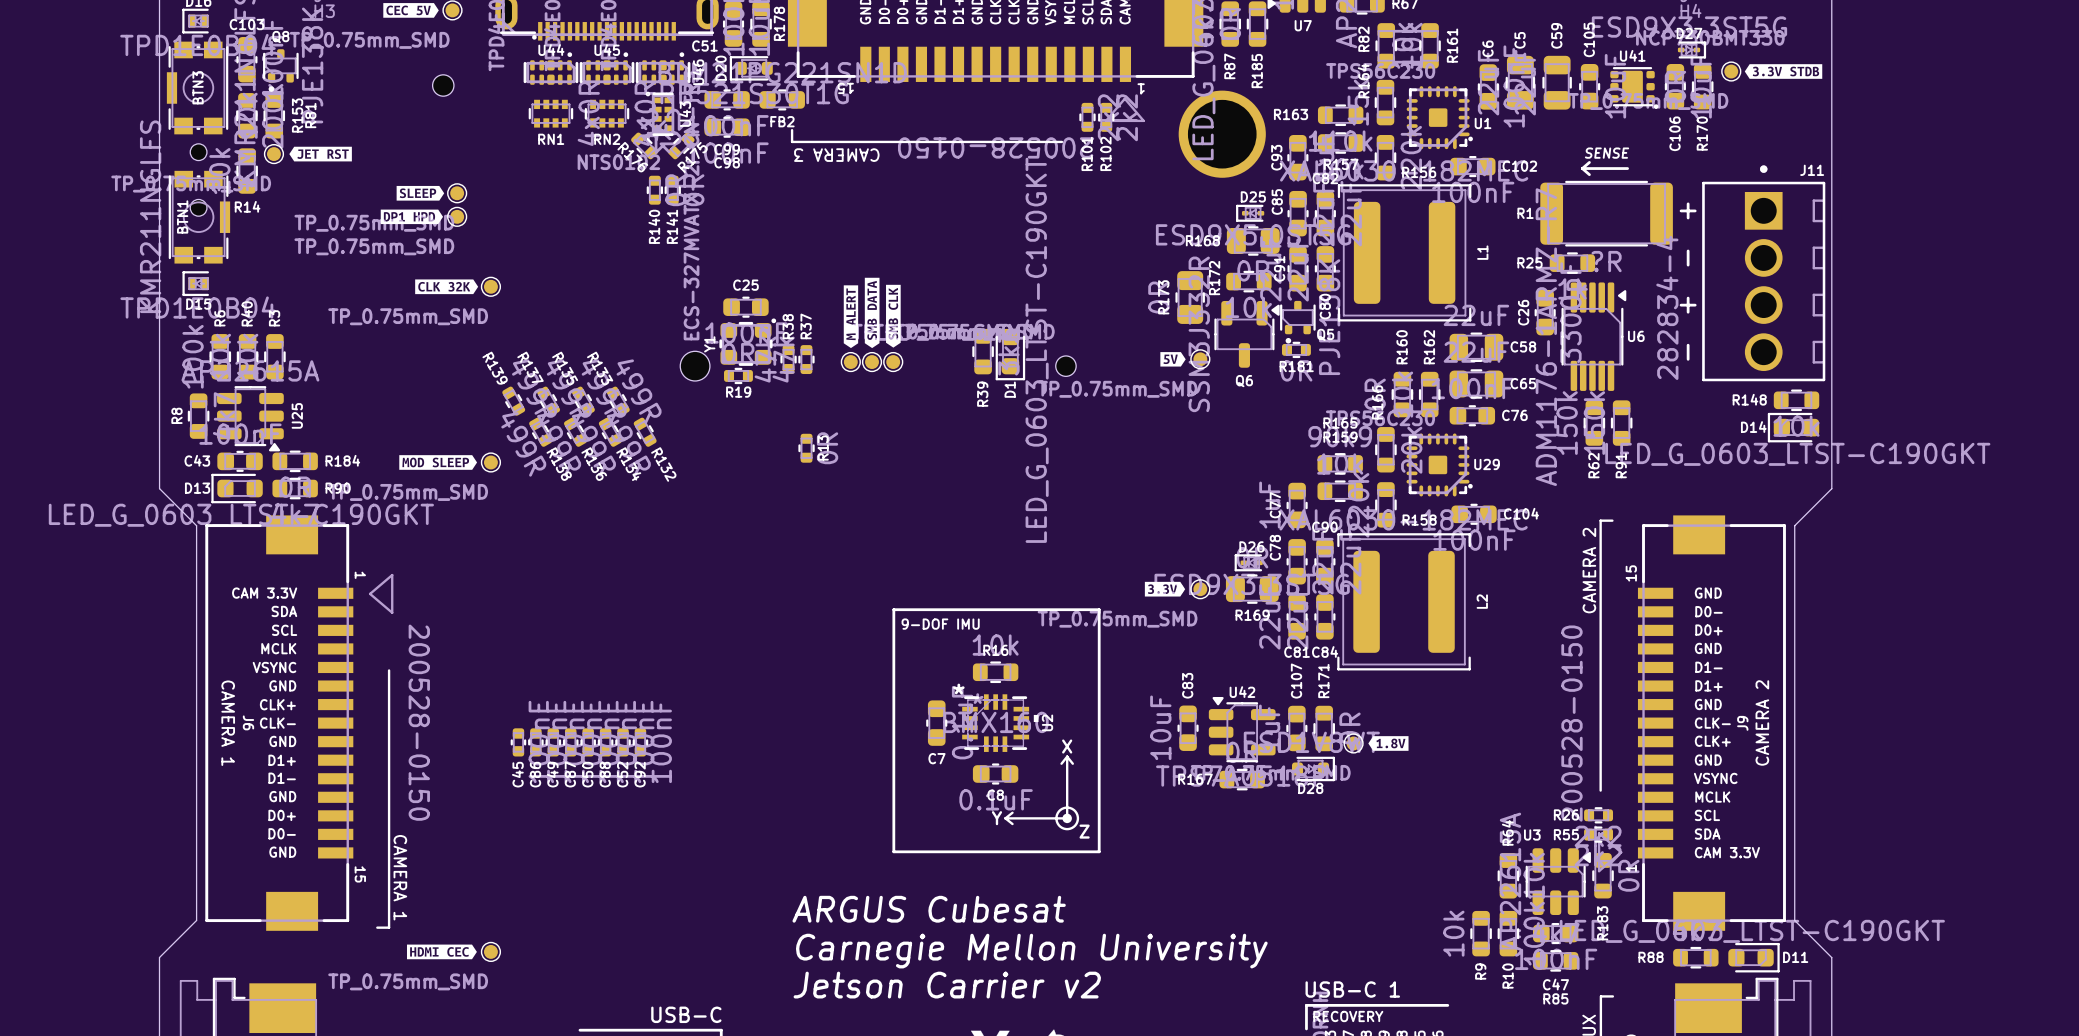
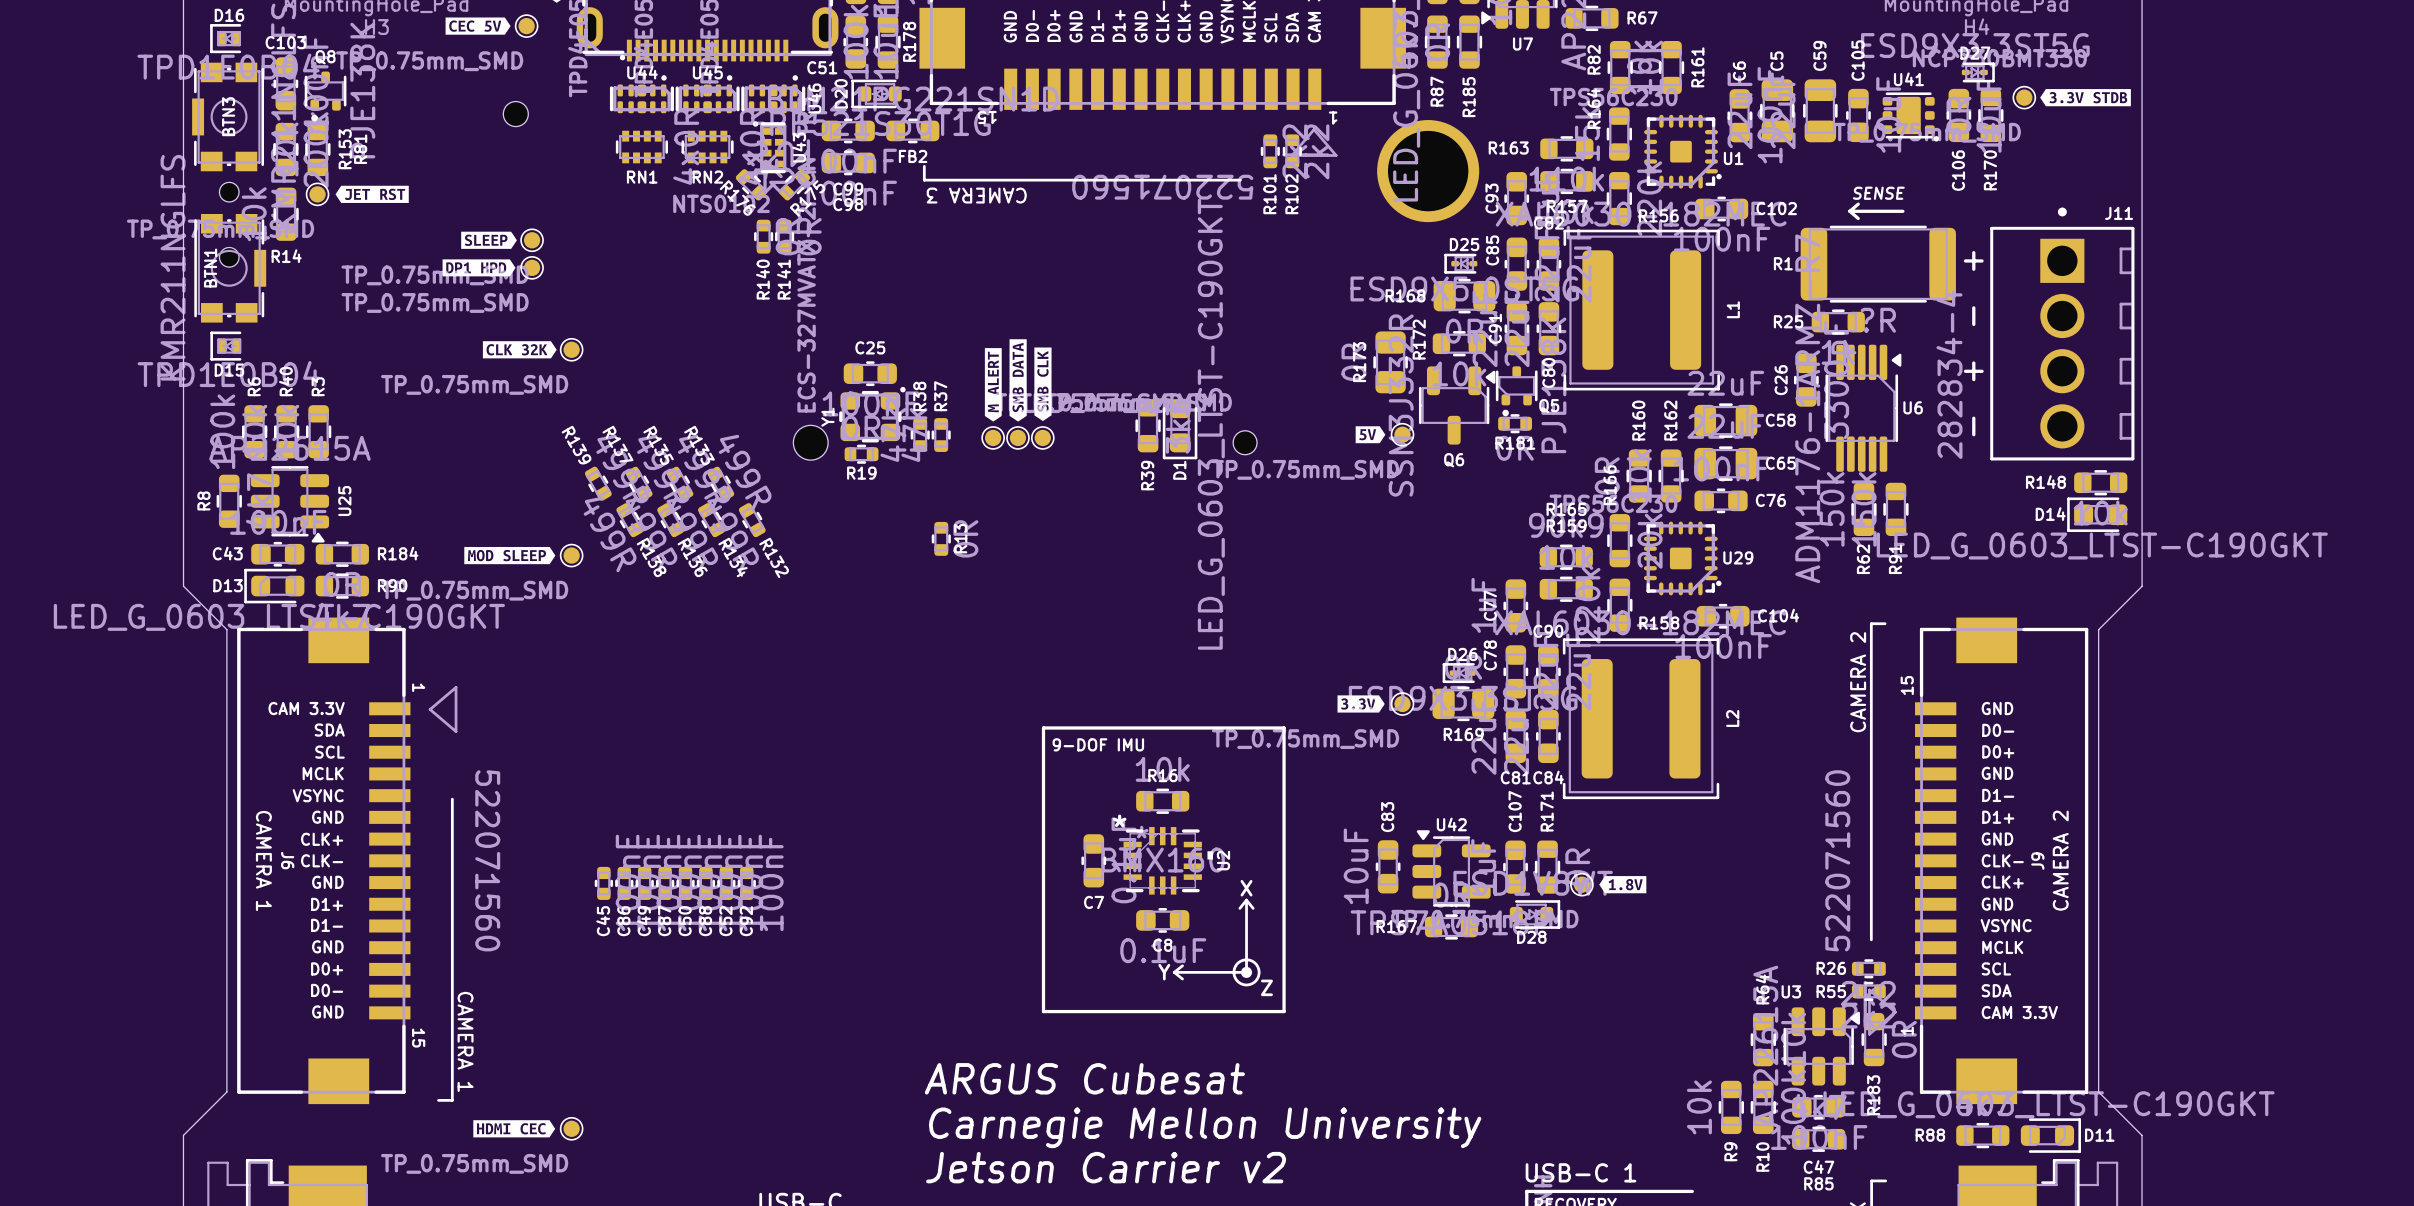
part value: 200528-0150 (996, 147) -> 522071560 (1162, 187)
J6 value: 200528-0150 (419, 722) -> 522071560 (487, 860)
J9 value: 200528-0150 (1571, 723) -> 522071560 (1837, 860)

